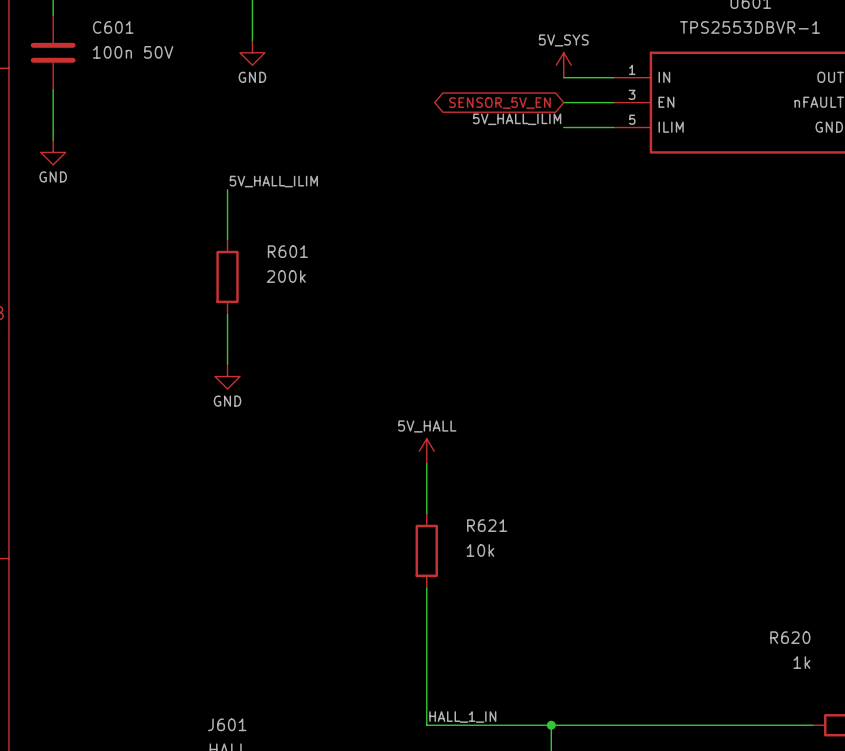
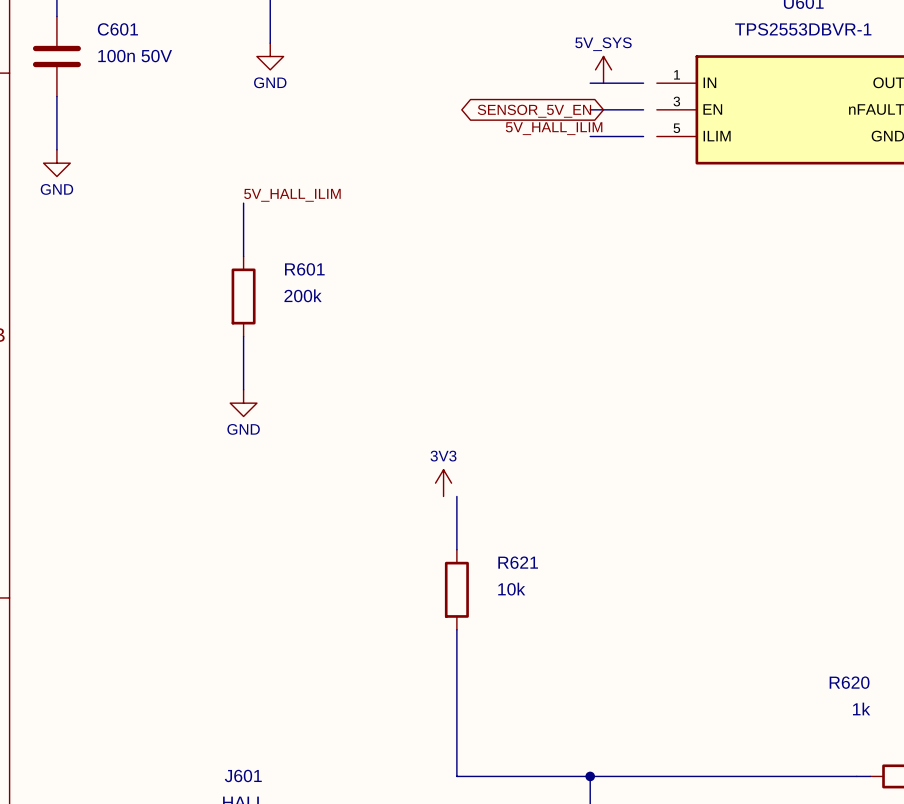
wire: (601, 77) (613, 77) -> (590, 83) (603, 83)
wire: (601, 102) (613, 102) -> (590, 109) (603, 109)
wire: (601, 127) (613, 127) -> (590, 136) (603, 136)
power symbol: none -> 3V3 (443, 483)
power symbol: 5V_HALL (426, 451) -> none
label: HALL_1_IN (462, 717) -> none

